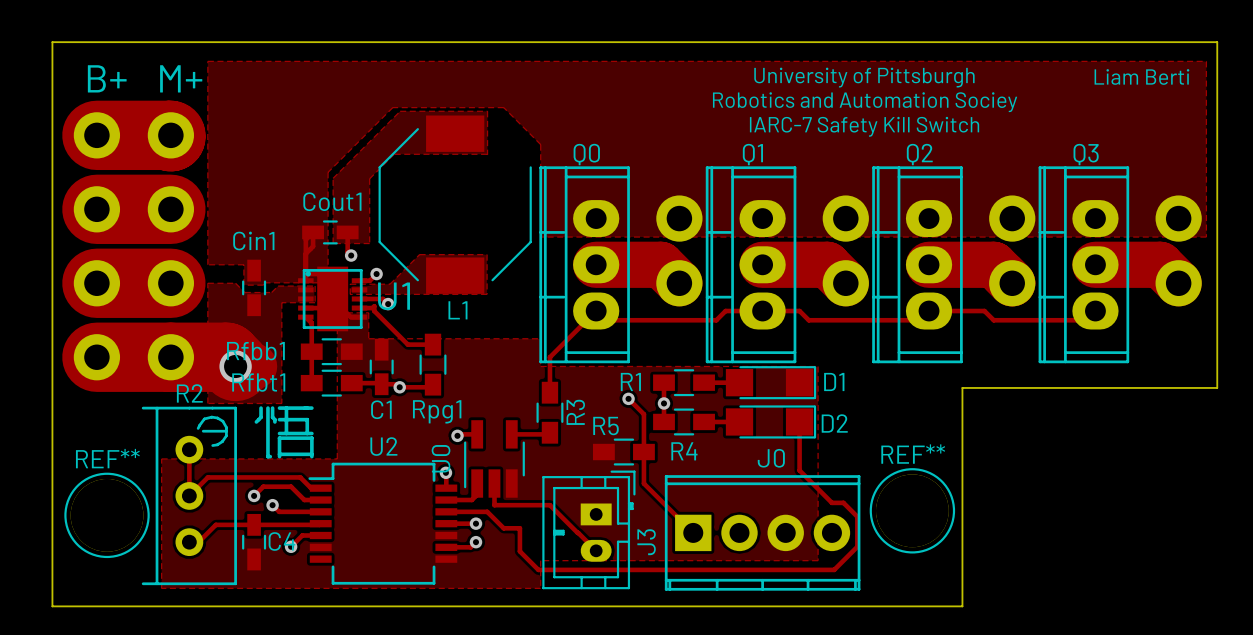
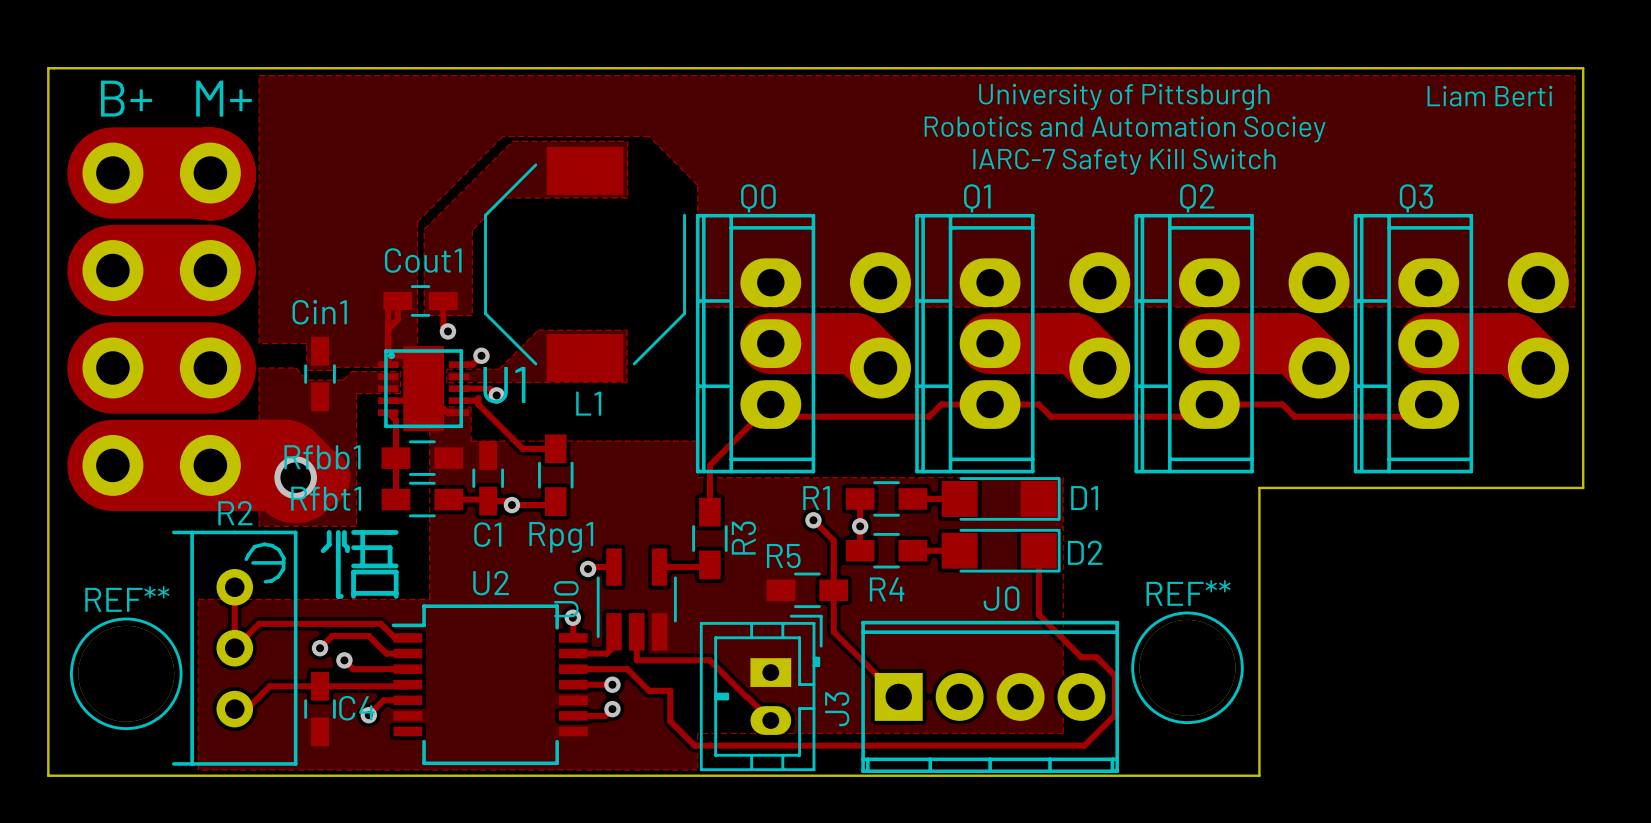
board edge: (52, 42) (52, 606) (962, 606) (962, 387) (1217, 387) (1217, 42) (52, 42) -> (48, 68) (48, 775) (1259, 775) (1259, 487) (1583, 487) (1583, 68) (48, 68)

